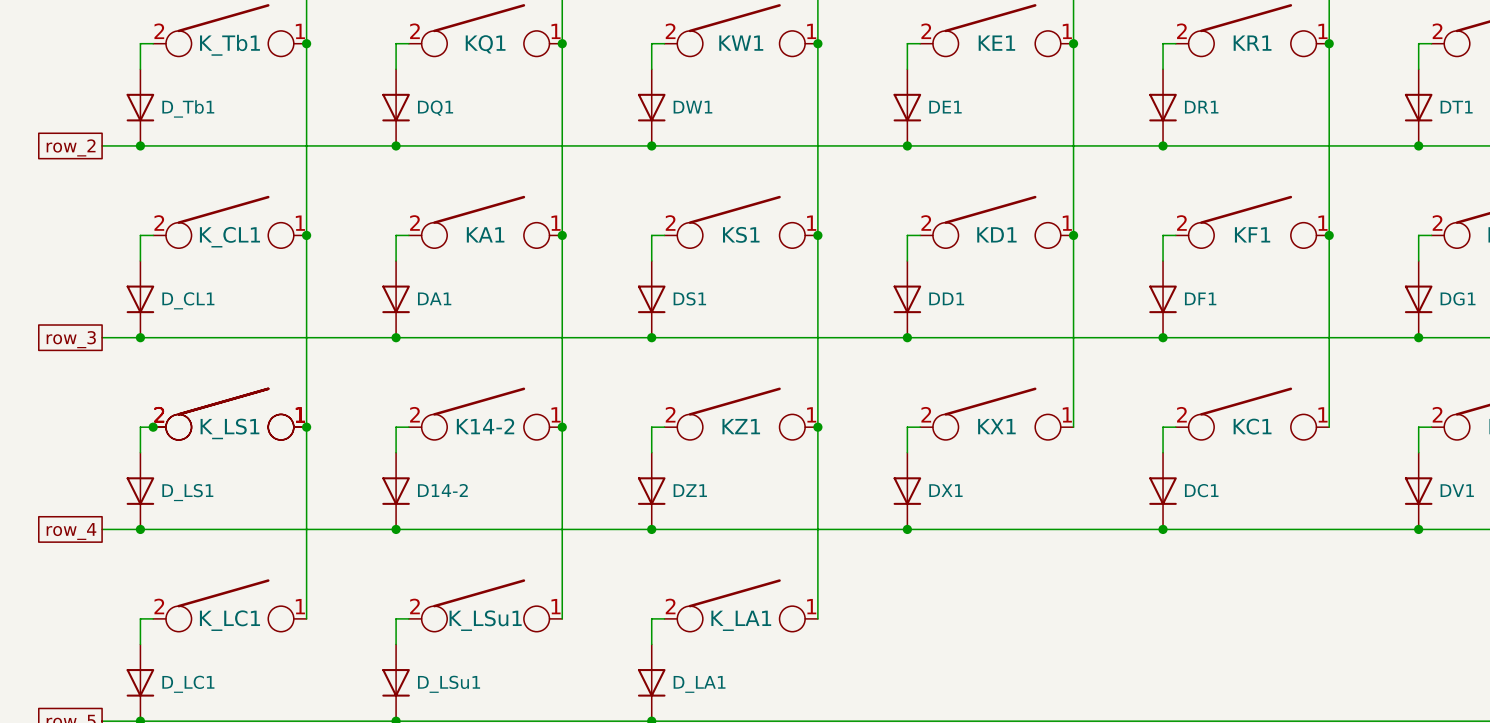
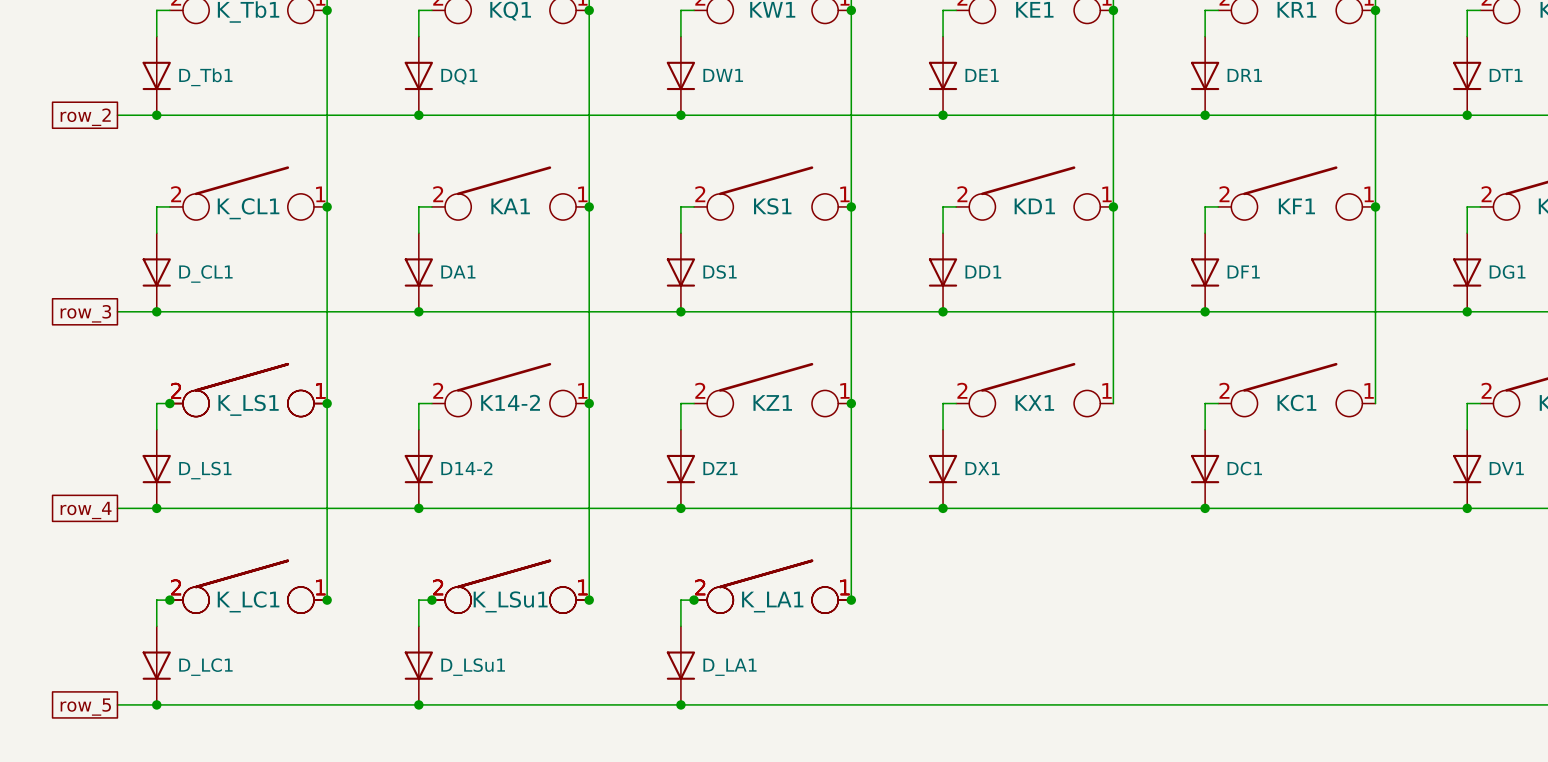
part: none -> (248, 586)
part: none -> (510, 586)
part: none -> (772, 586)
junction: none -> (169, 600)
junction: none -> (327, 600)
junction: none -> (431, 600)
junction: none -> (589, 600)
junction: none -> (694, 600)
junction: none -> (851, 600)

